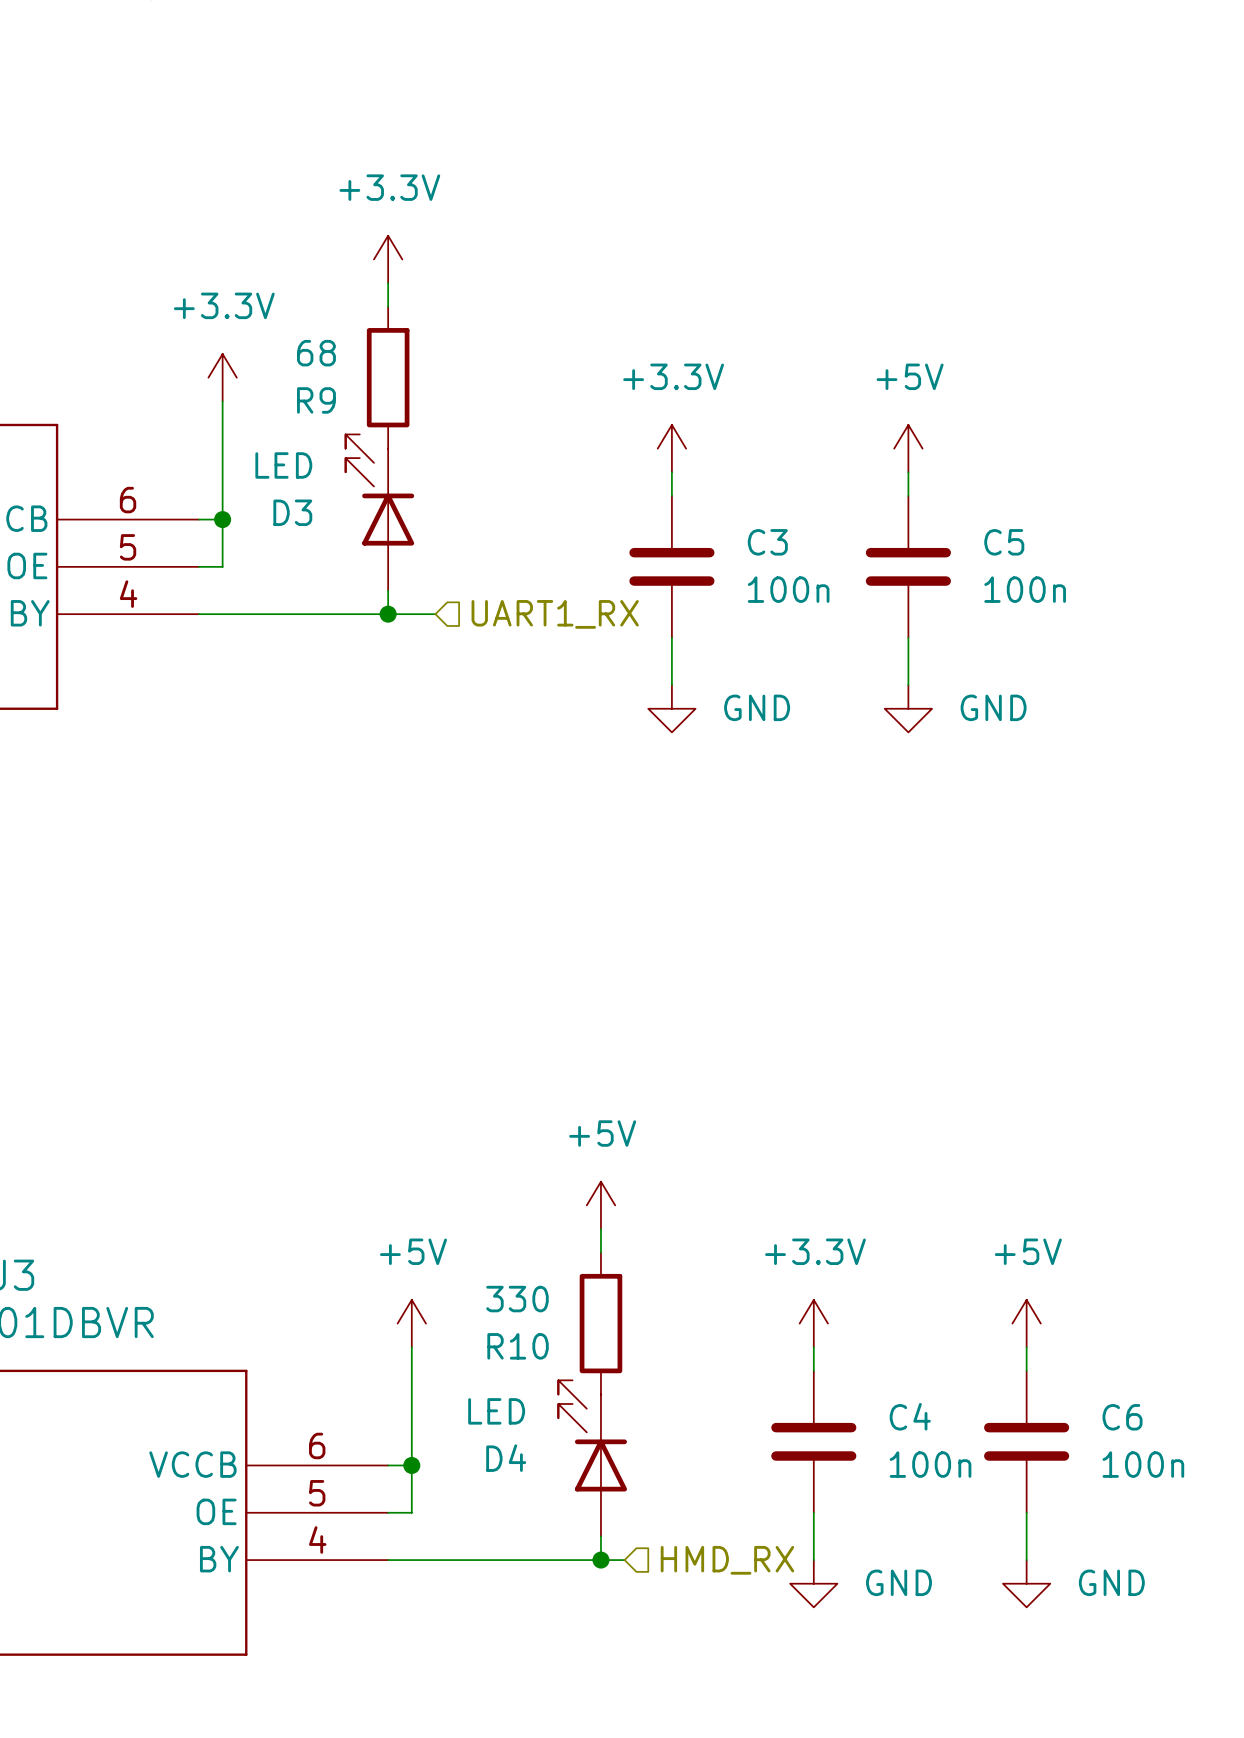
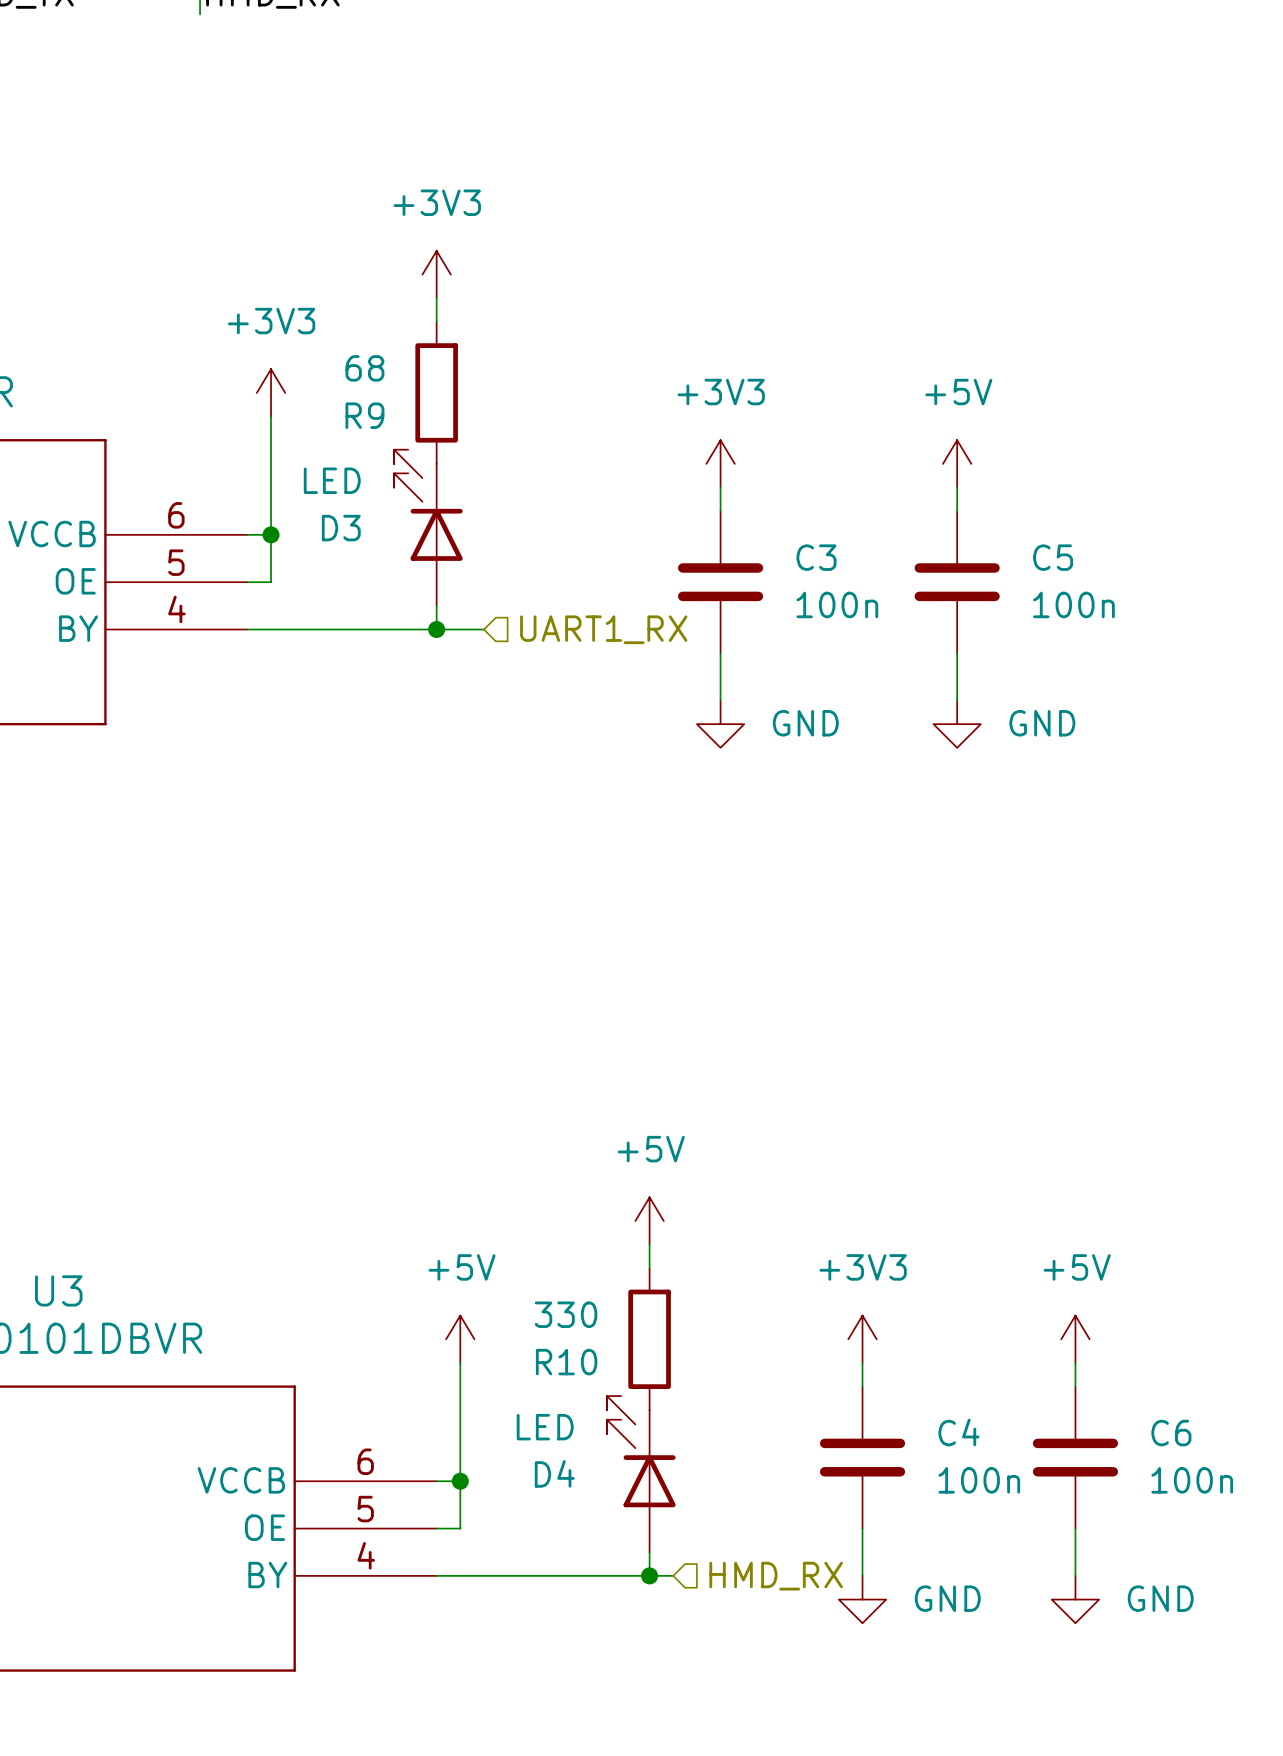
power symbol: +3.3V (388, 259) -> +3V3 (436, 274)
power symbol: +3.3V (222, 377) -> +3V3 (271, 392)
power symbol: +3.3V (671, 448) -> +3V3 (720, 463)
power symbol: +3.3V (813, 1323) -> +3V3 (862, 1339)

